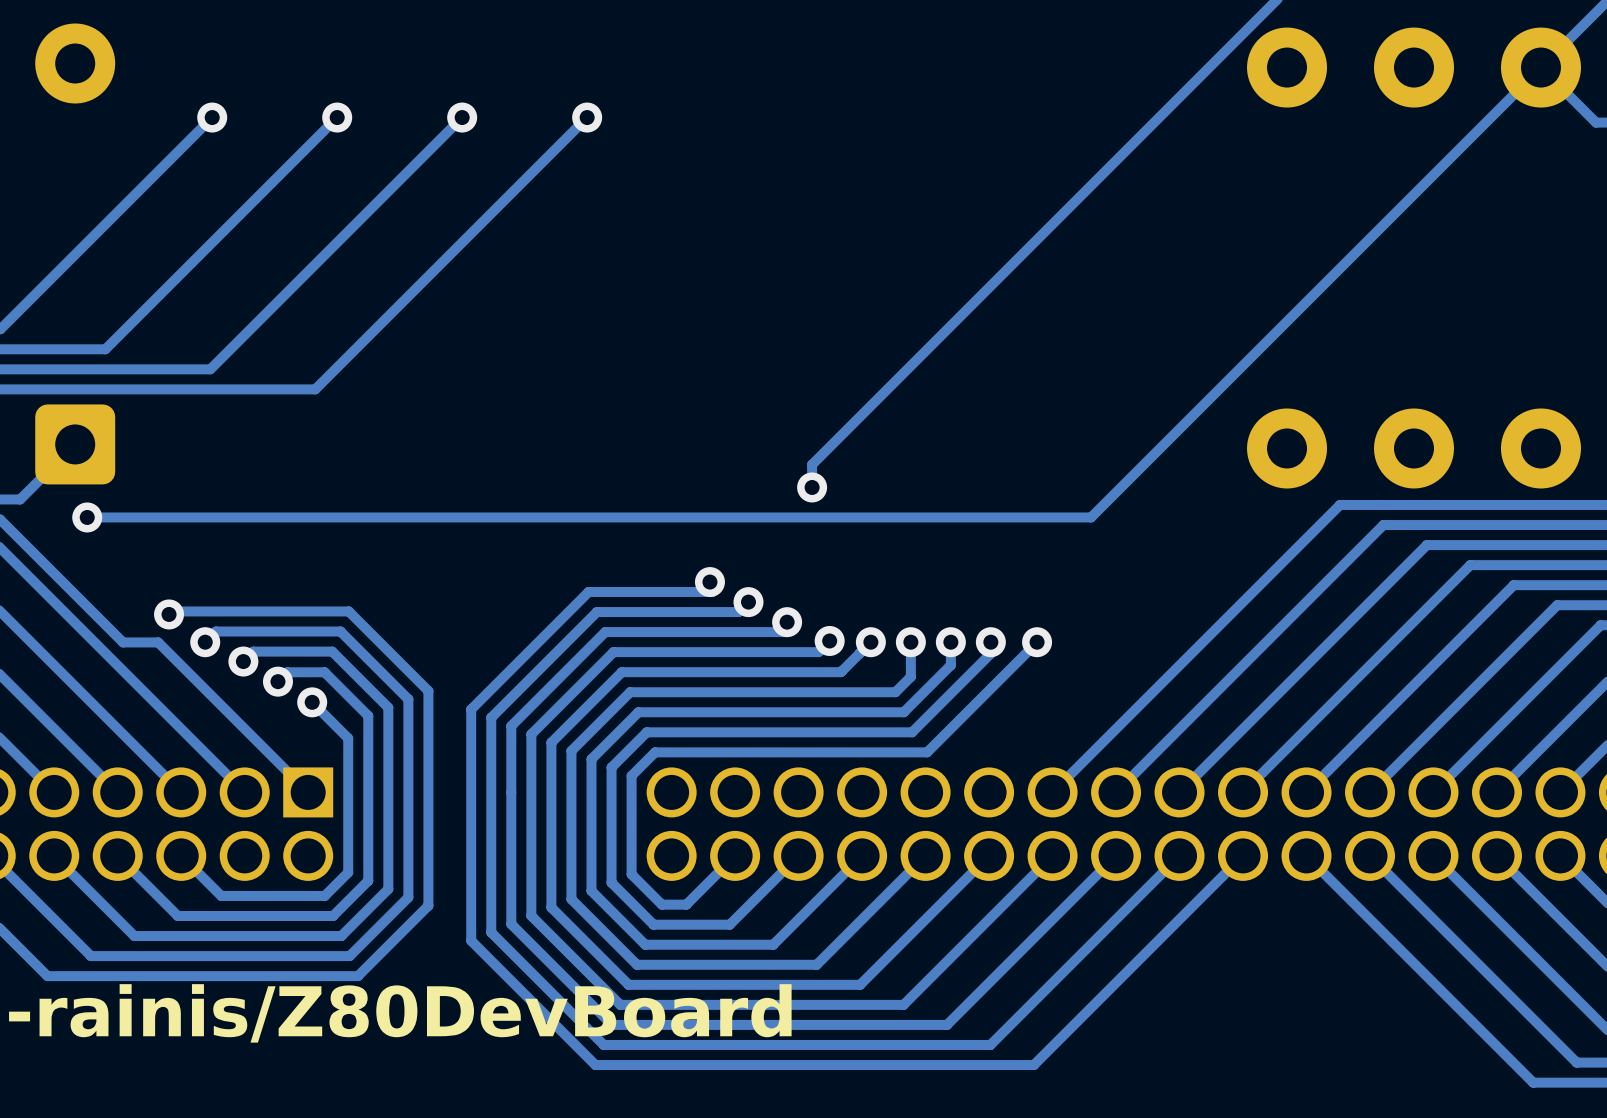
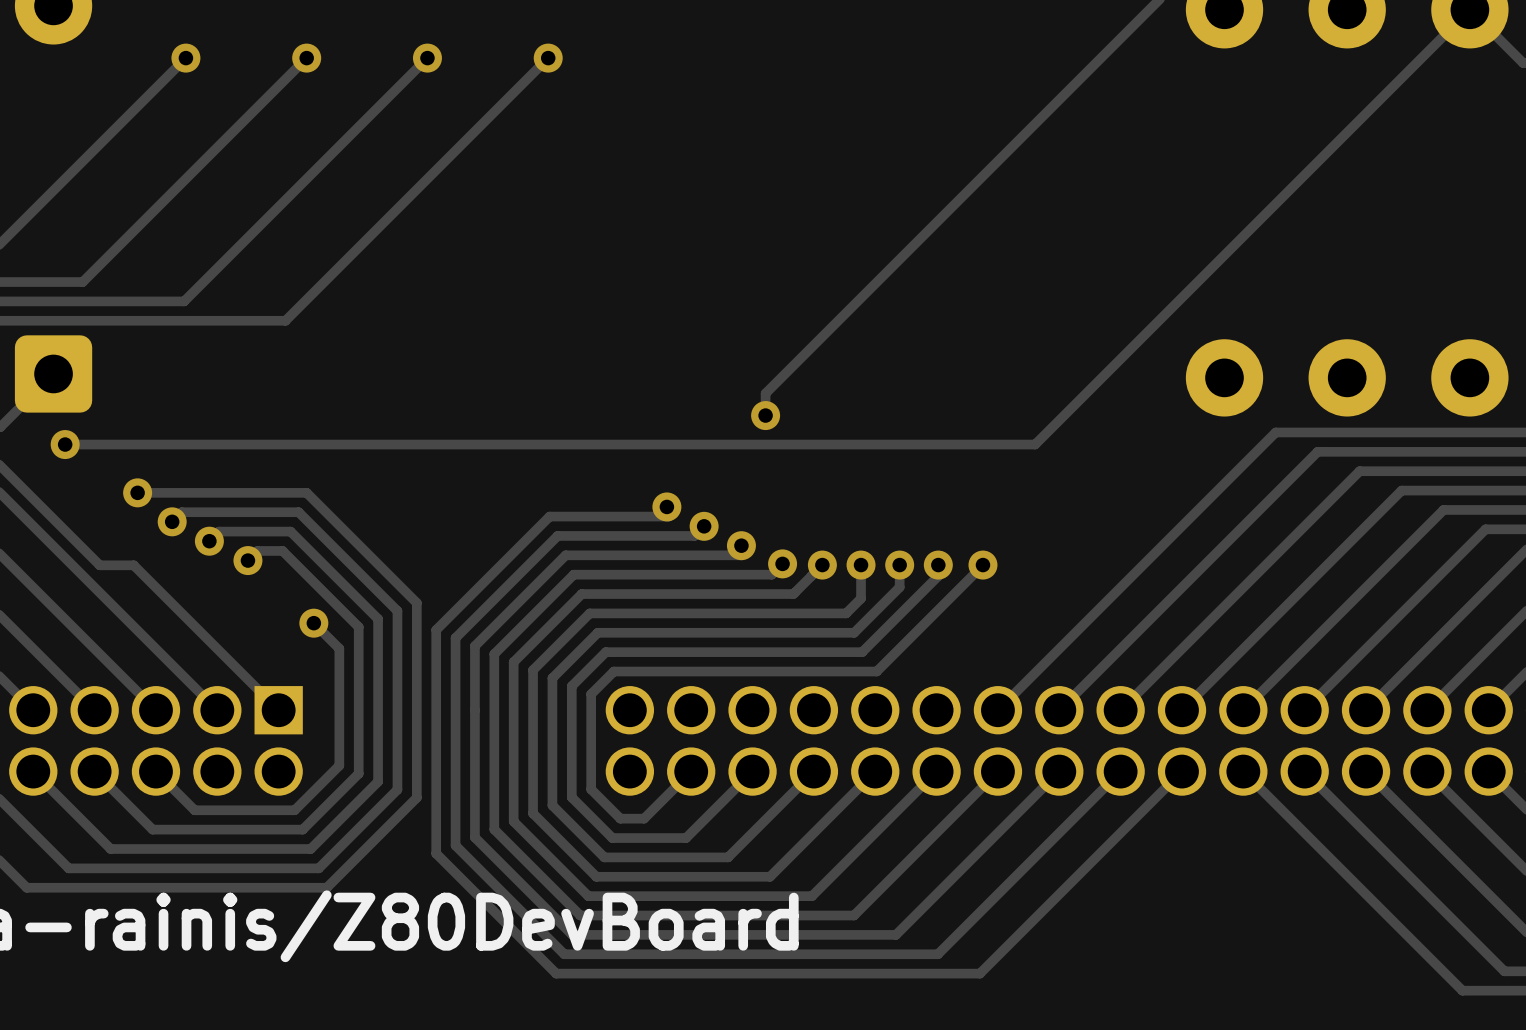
via: none -> (137, 492)
track: (169, 614) (172, 611) (348, 611) (428, 691) (428, 905) -> (137, 492) (306, 492) (416, 602) (416, 797) (394, 819)
via position: (169, 614) -> (172, 521)
via: none -> (209, 541)
via: none -> (247, 560)
track: (205, 642) (215, 631) (340, 631) (408, 699) (408, 897) -> (172, 521) (181, 512) (298, 512) (397, 611) (397, 789) (375, 811)
via: (205, 642) -> none
track: (243, 661) (253, 651) (332, 651) (388, 707) (388, 889) -> (209, 541) (219, 531) (290, 531) (378, 619) (378, 781) (356, 803)
via: (243, 661) -> none
track: (277, 681) (287, 672) (324, 672) (368, 715) (368, 880) -> (247, 560) (257, 550) (282, 550) (358, 627) (358, 773) (336, 795)
via: (277, 681) -> none
track: (312, 702) (348, 738) (348, 872) -> (313, 623) (339, 648) (339, 765) (317, 787)
via position: (312, 702) -> (313, 623)

